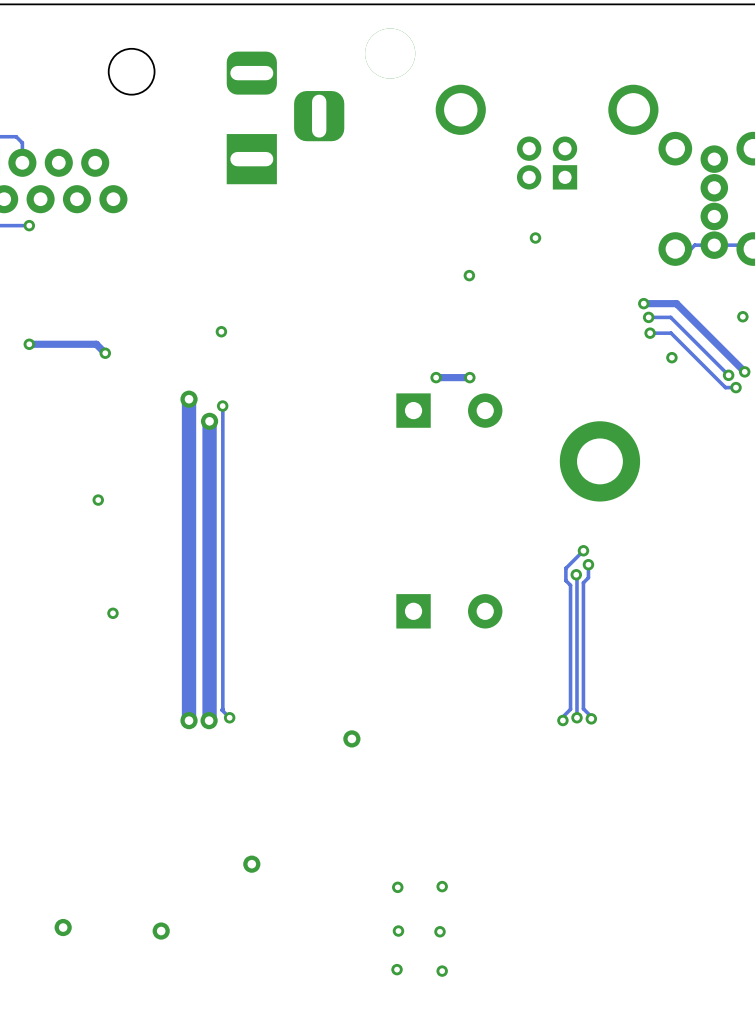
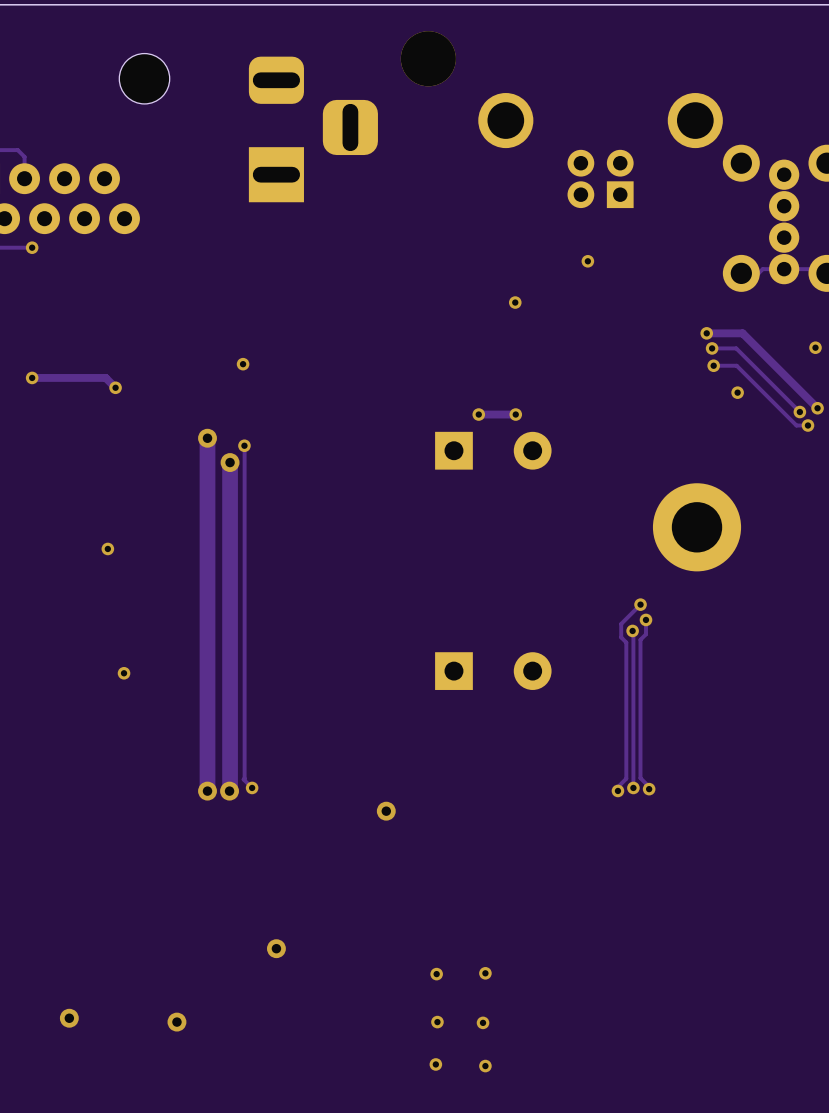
part position: (599, 461) -> (697, 527)

